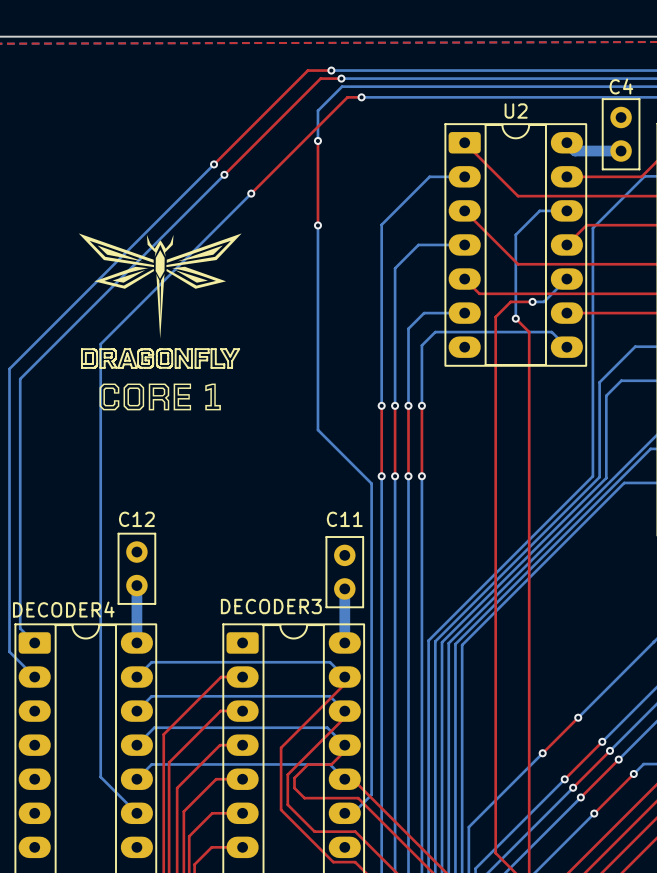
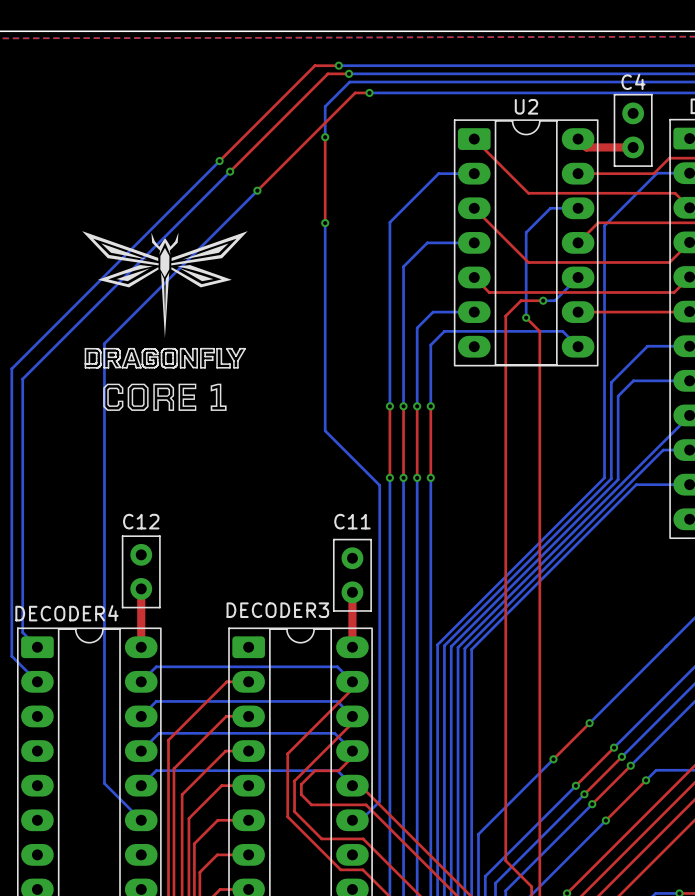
bottom track: (566, 142) (575, 151) (621, 151) -> none
top track: none -> (578, 139) (586, 147) (633, 147)
bottom track: (136, 585) (136, 642) -> none
top track: none -> (141, 588) (141, 647)
bottom track: (344, 588) (344, 642) -> none
top track: none -> (352, 592) (352, 647)

